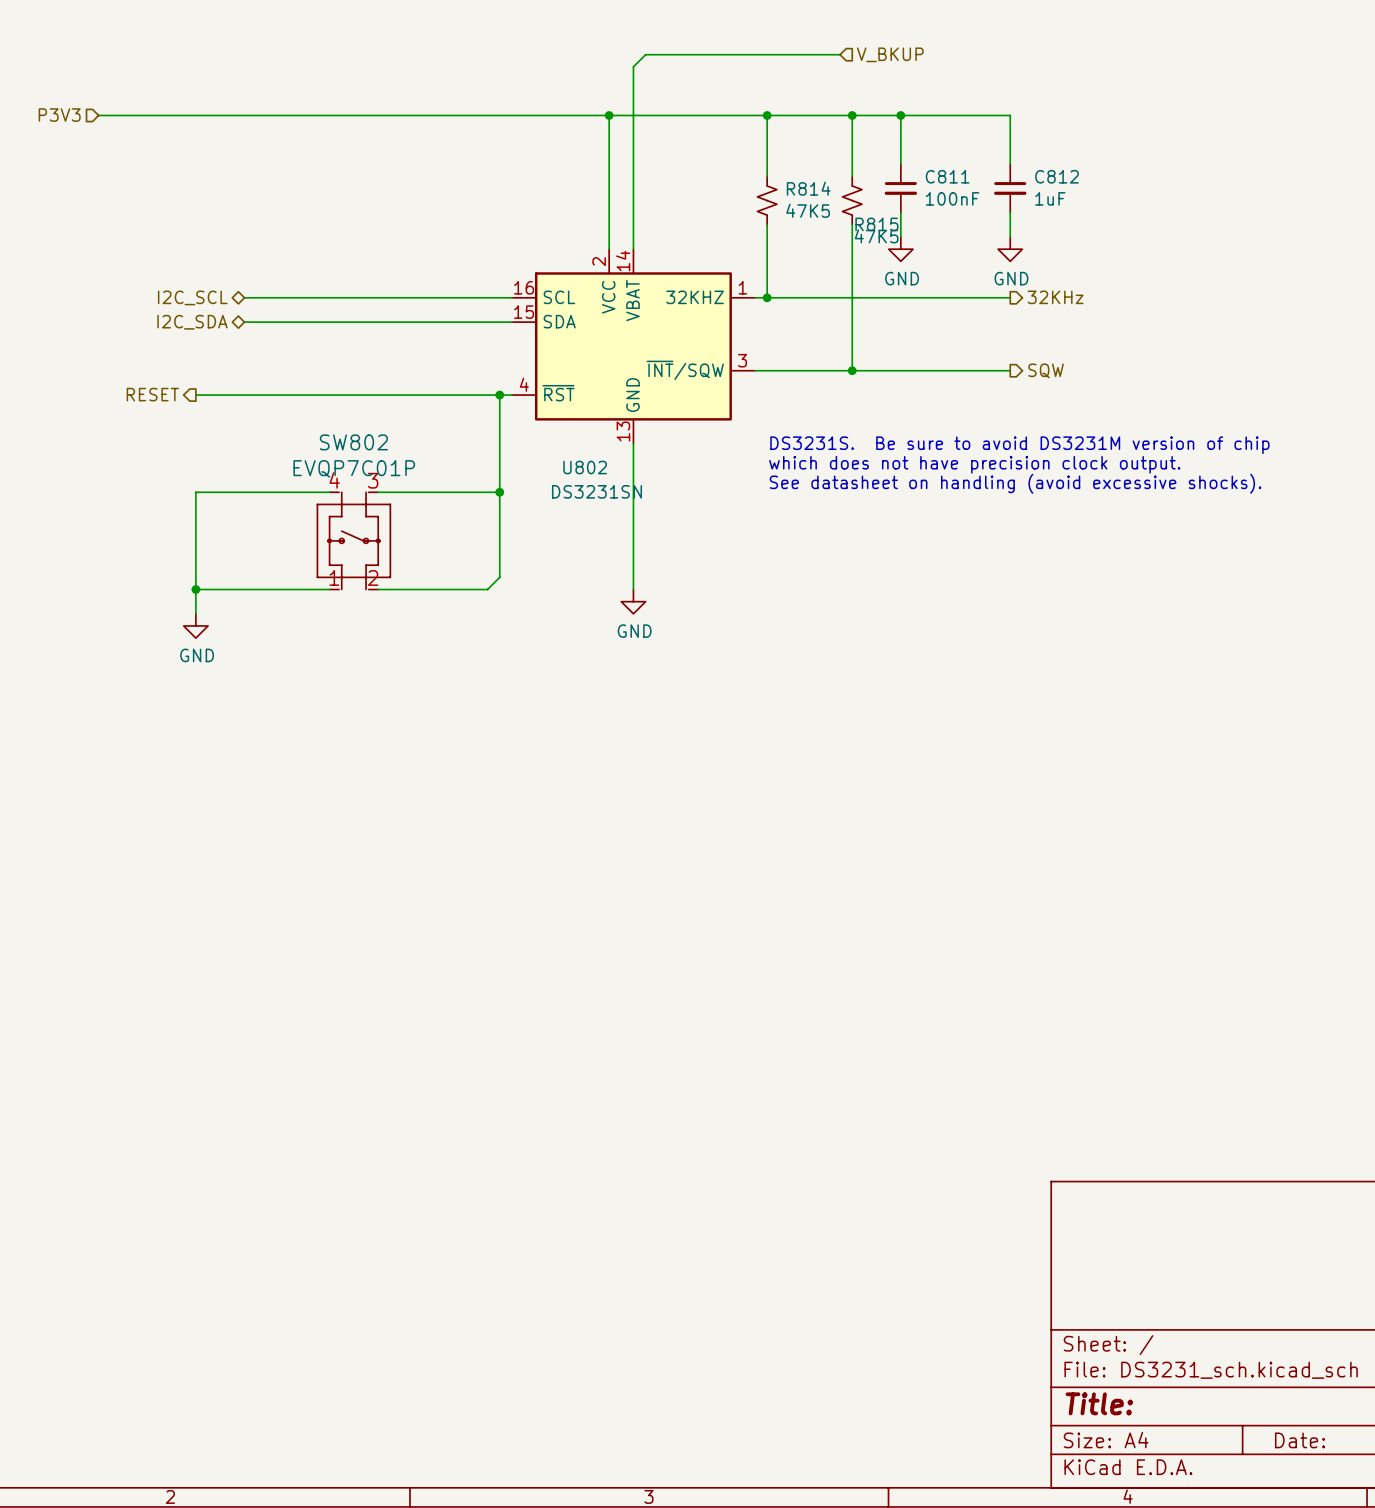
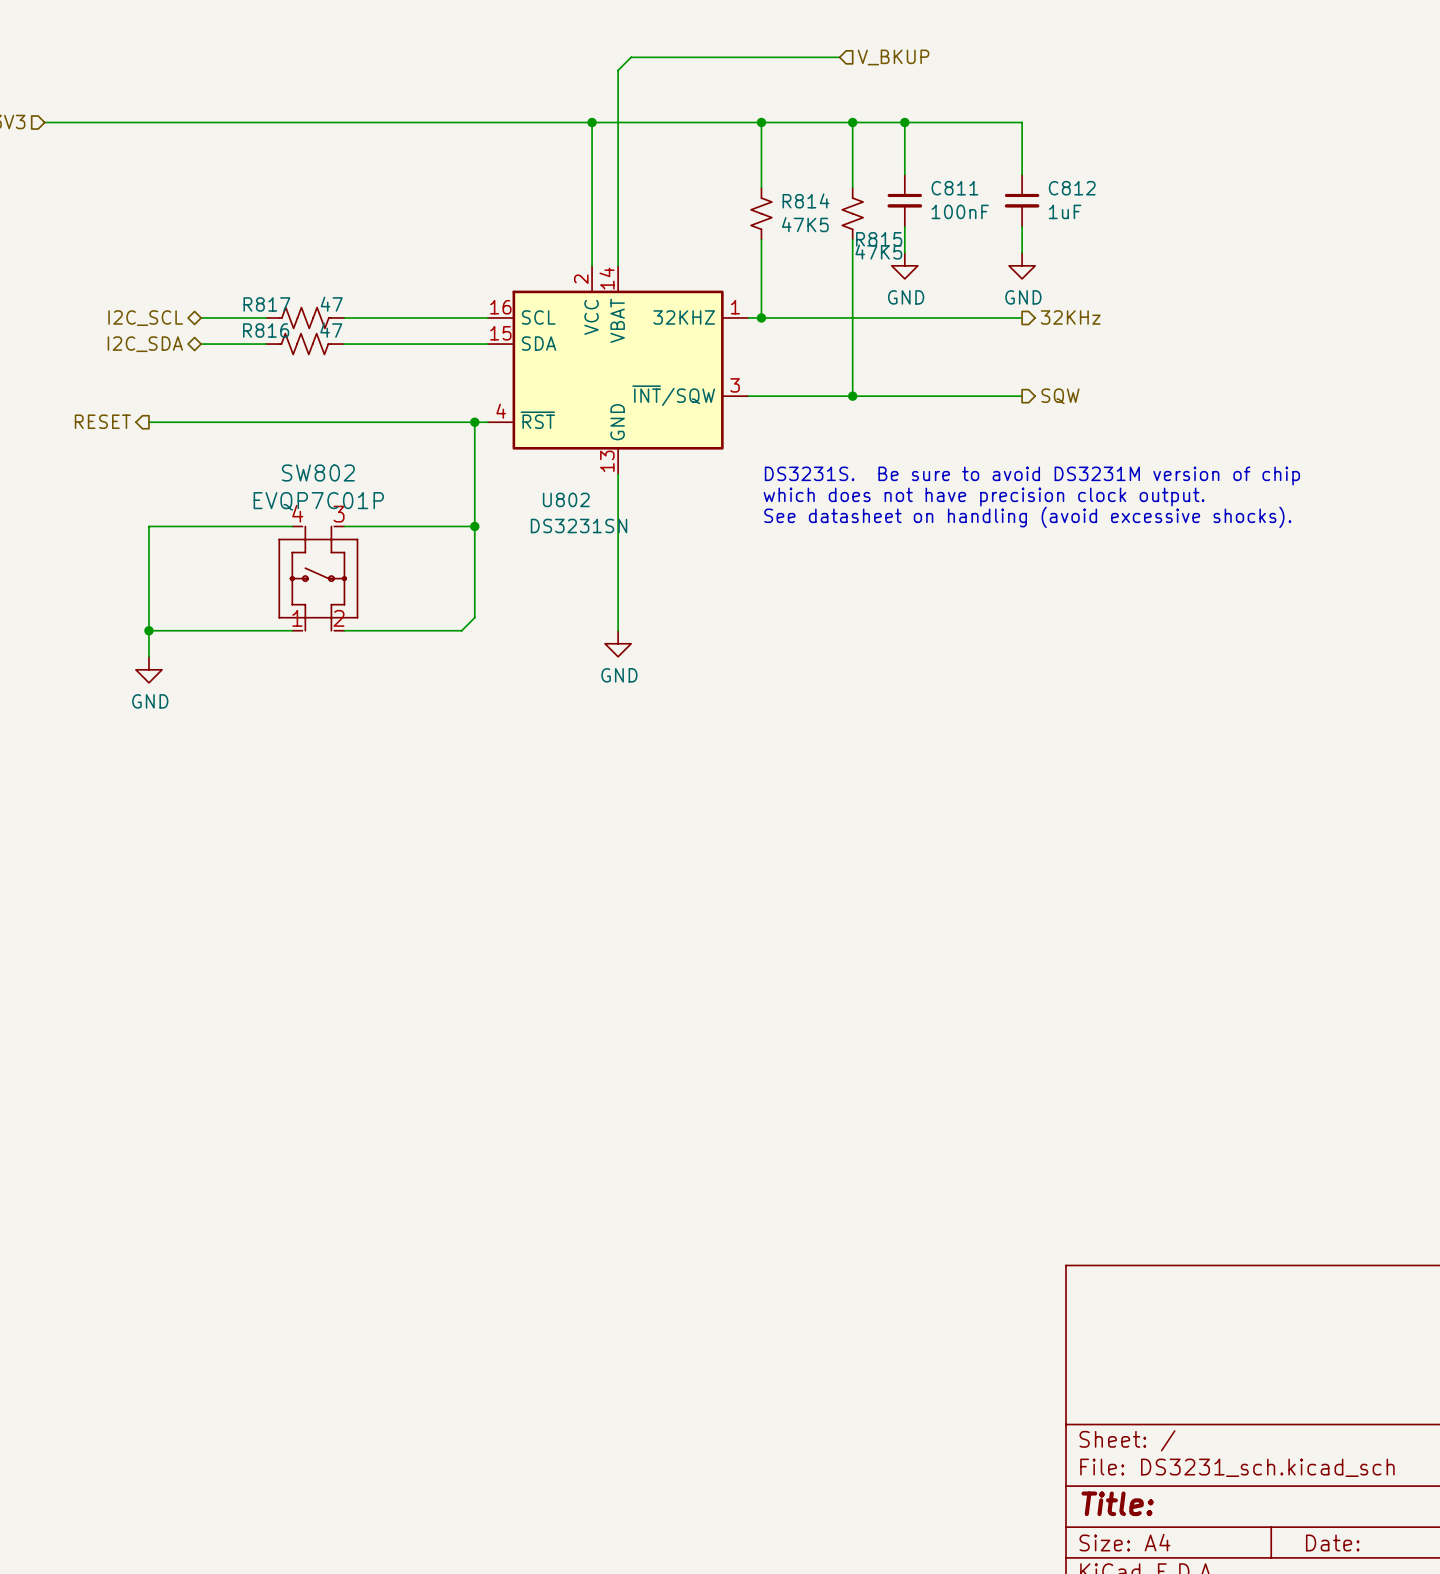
R817: none -> 47 (305, 317)
R816: none -> 47 (304, 344)

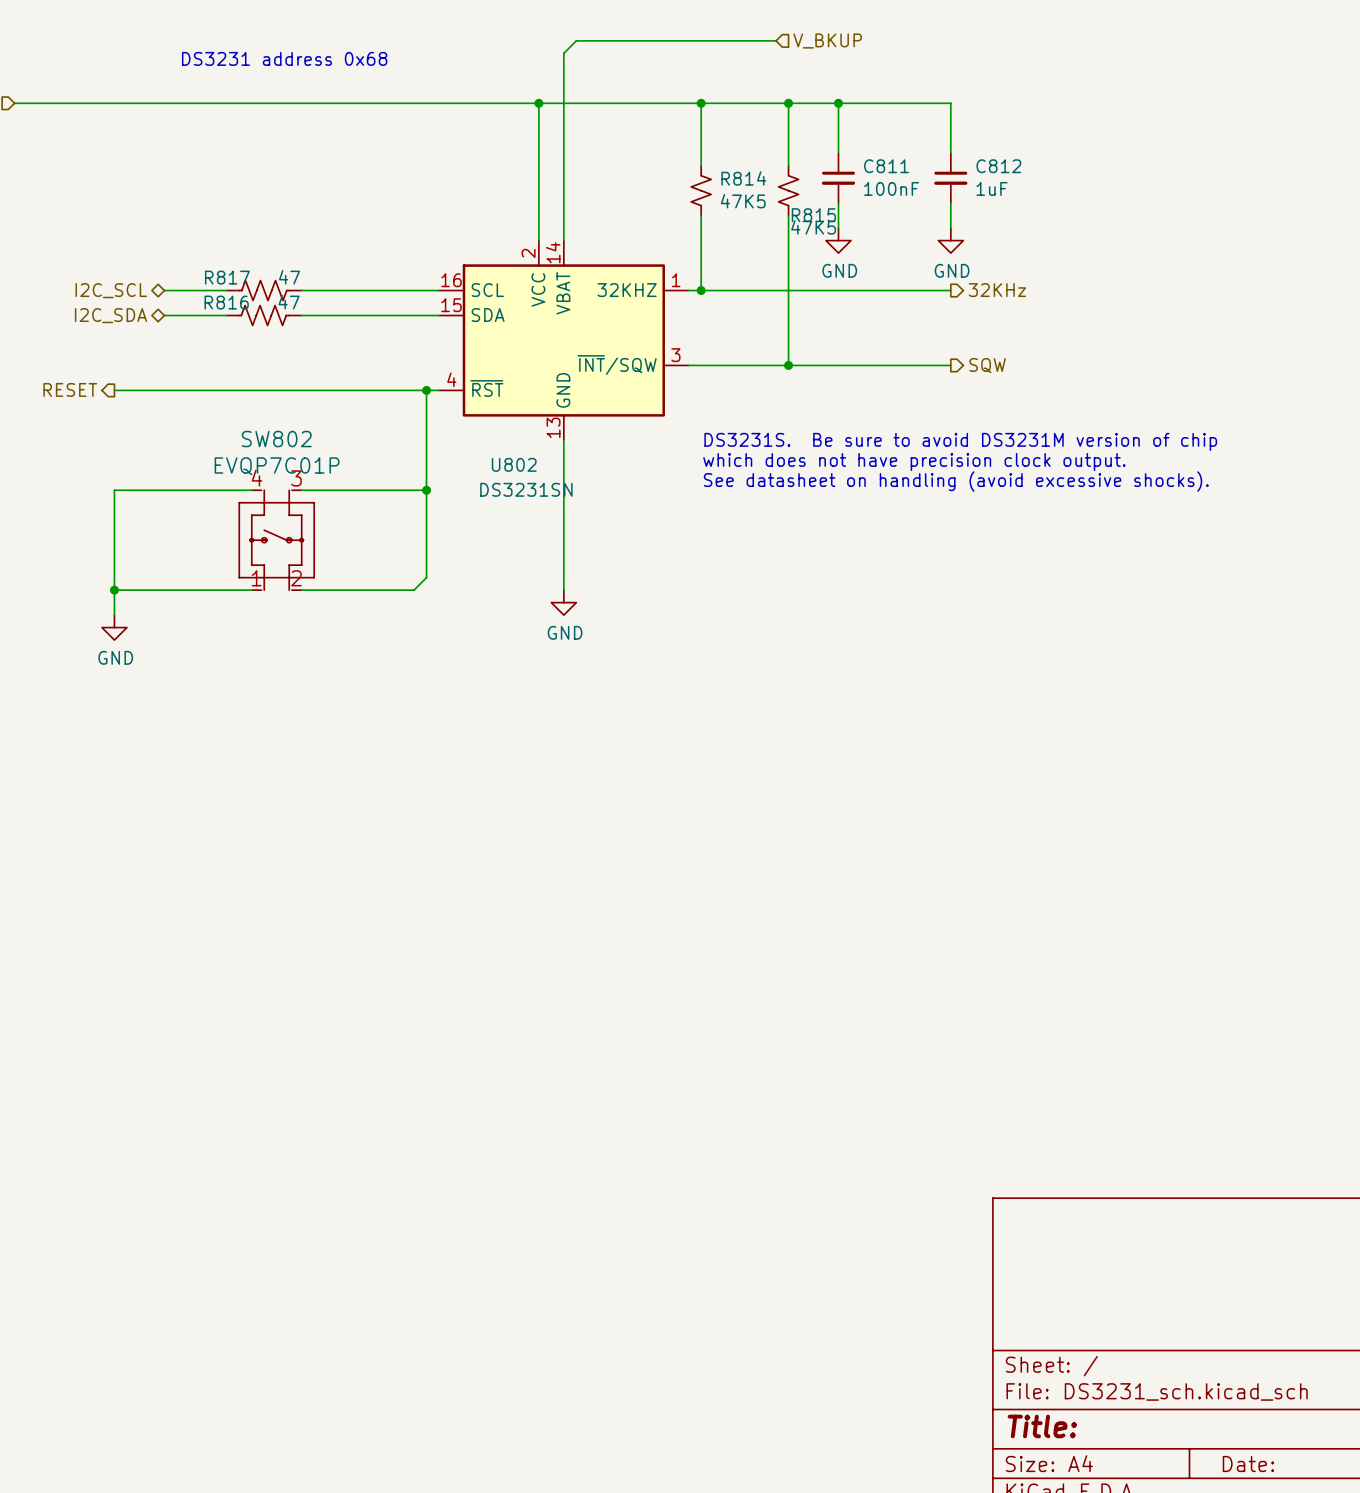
text: none -> DS3231 address 0x68 (284, 58)

